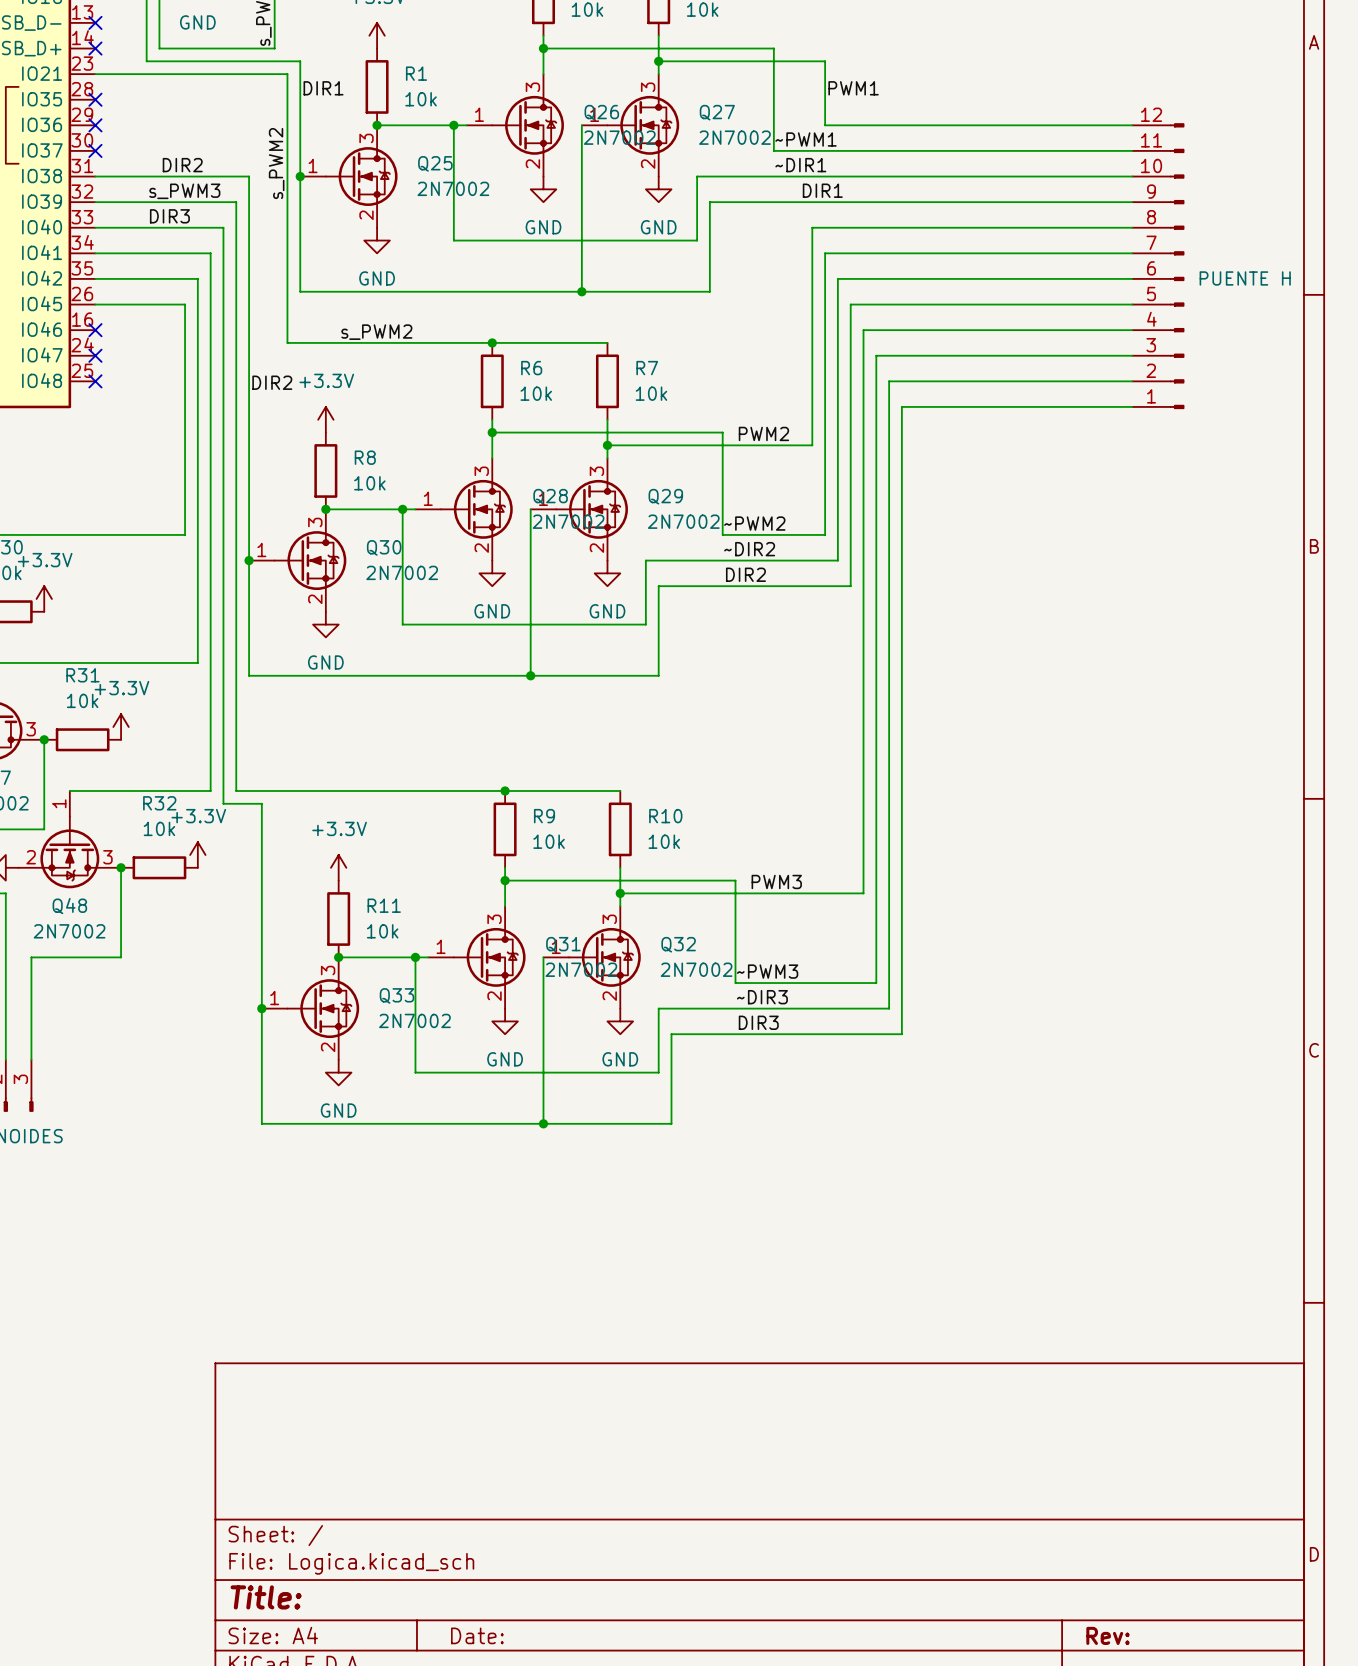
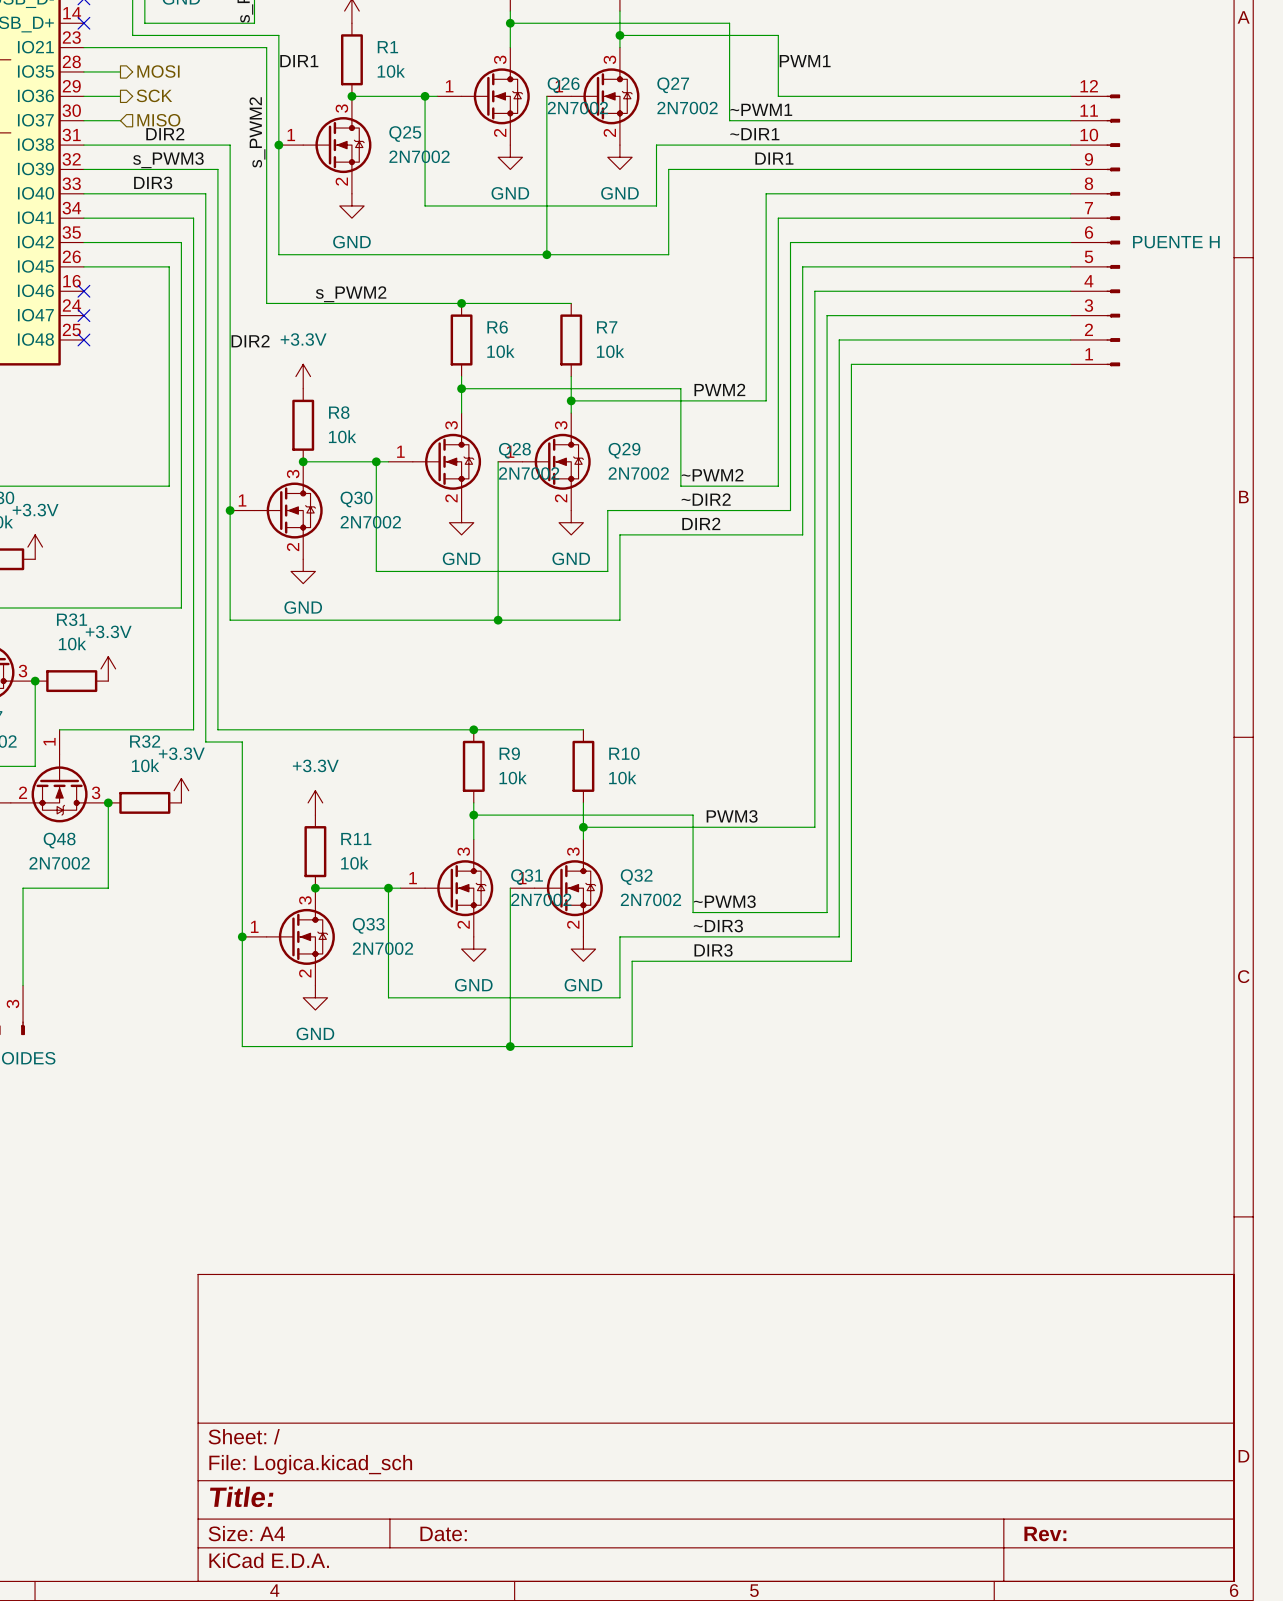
wire: none -> (83, 71) (120, 71)
no-connect mark: (95, 99) -> none
hierarchical label: none -> MOSI (158, 71)
hierarchical label: none -> SCK (154, 95)
wire: none -> (83, 96) (120, 96)
no-connect mark: (95, 125) -> none
wire: none -> (83, 120) (120, 120)
no-connect mark: (95, 150) -> none
hierarchical label: none -> MISO (158, 120)

